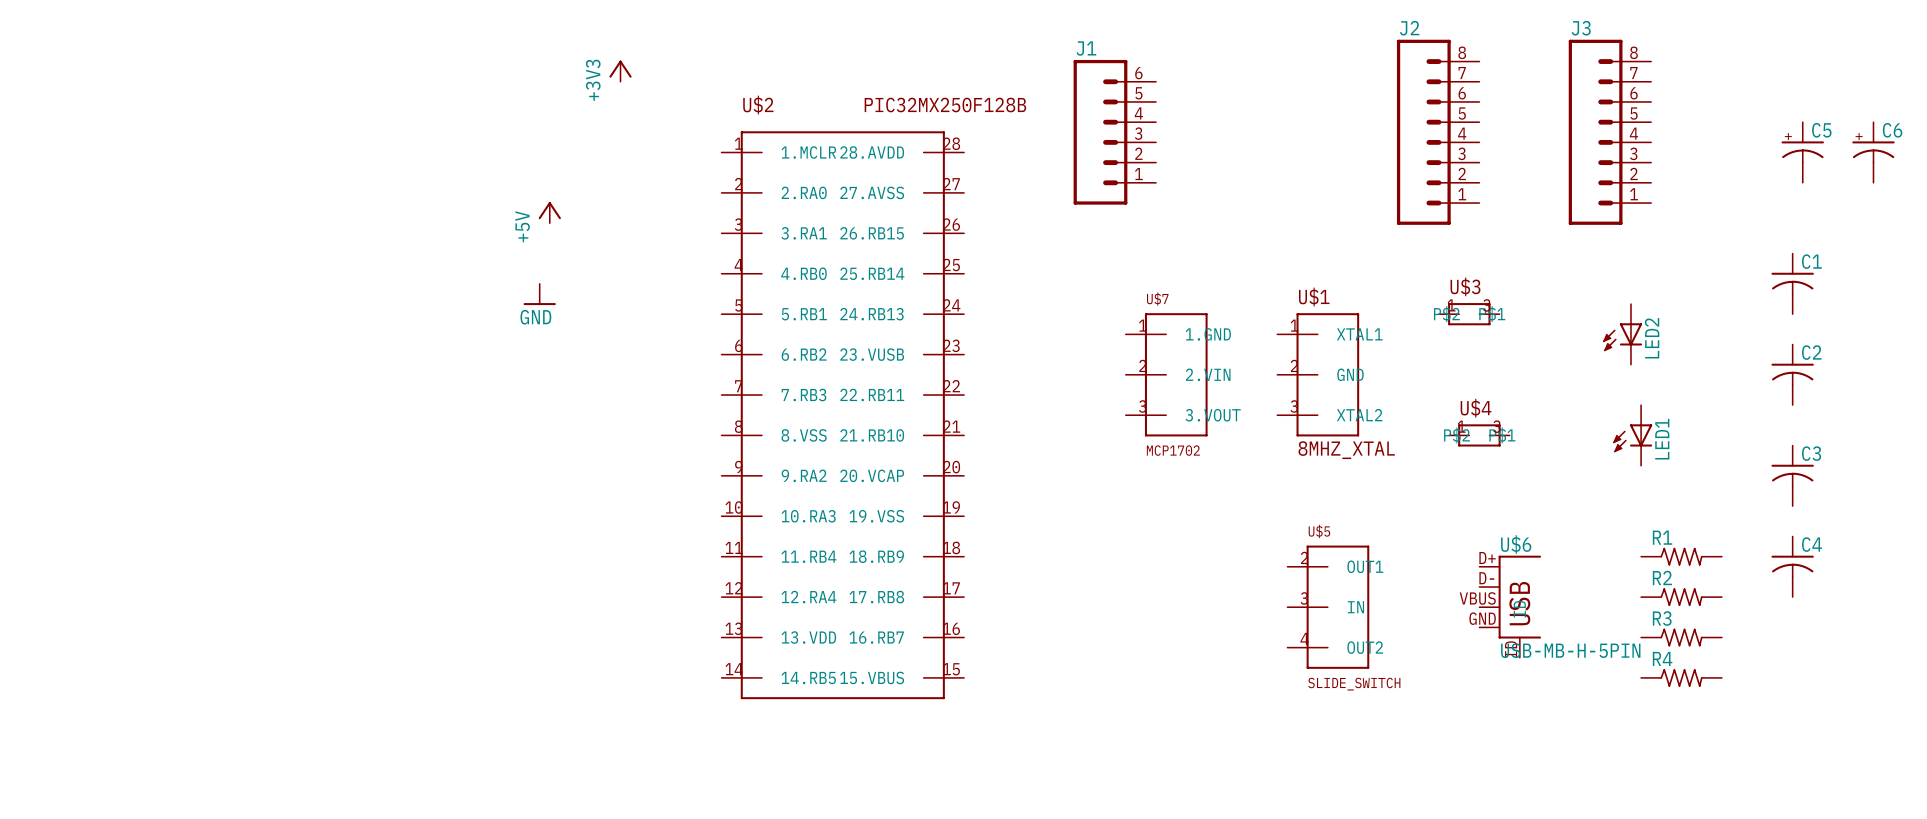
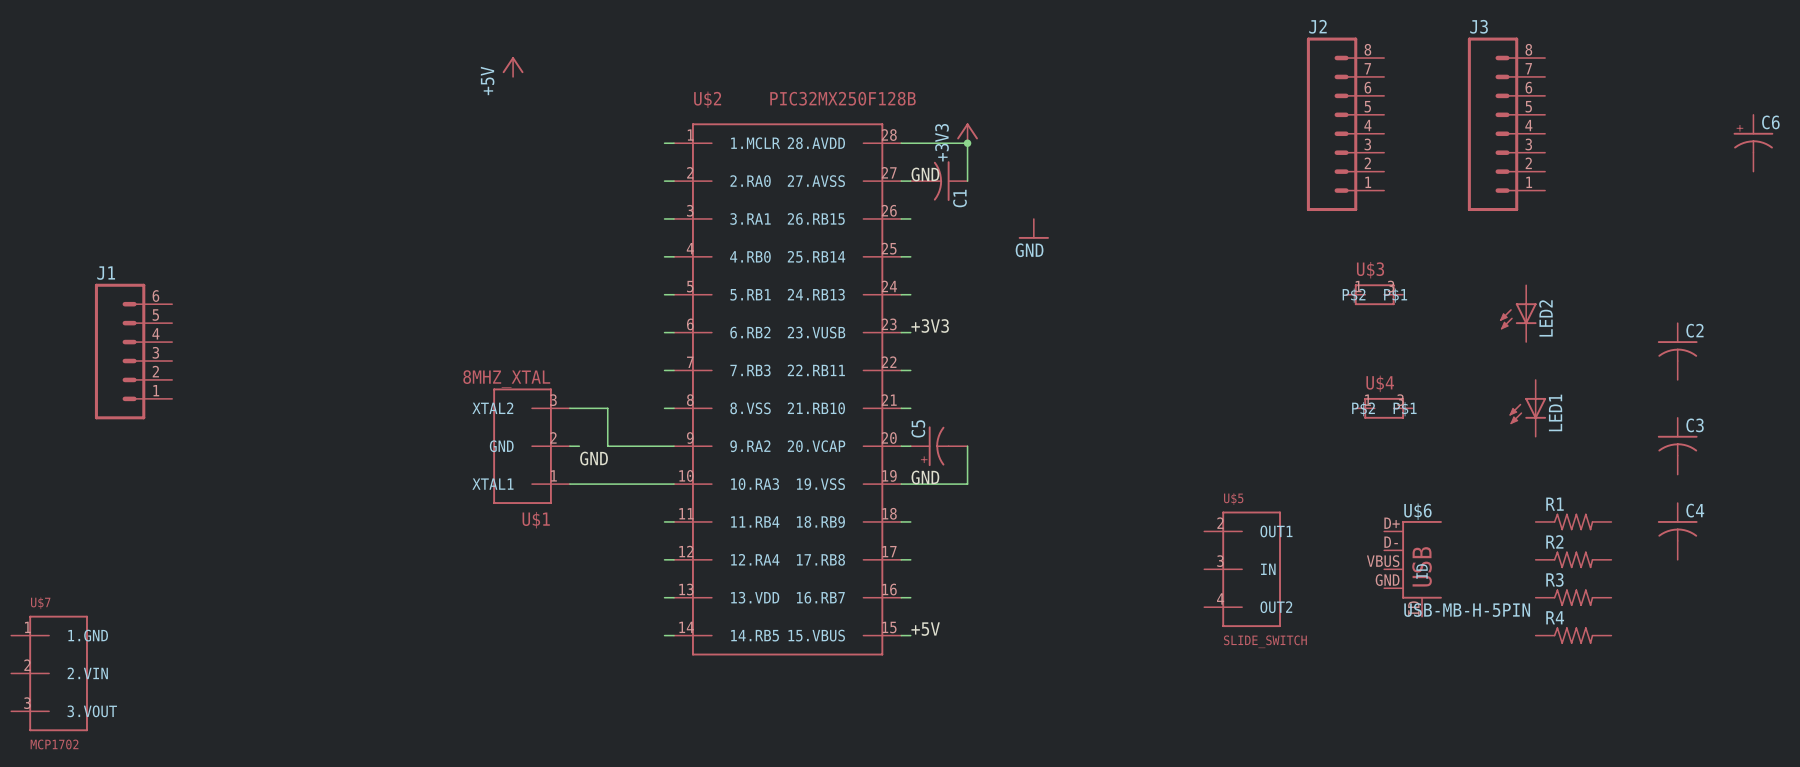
power symbol: +3V3 (620, 71) -> none
U$2 value position: PIC32MX250F128B (945, 105) -> PIC32MX250F128B (843, 98)
J1 position: (1114, 132) -> (133, 351)
power symbol: none -> +3V3 (967, 133)
C5 rotation: 0° (1802, 148) -> 90° counterclockwise (935, 446)
wire: none -> (664, 143) (674, 143)
wire: none -> (901, 143) (967, 143) (967, 181)
junction: none -> (967, 143)
C5 position: (1802, 152) -> (939, 446)
label: none -> GND (925, 174)
wire: none -> (664, 181) (674, 181)
wire: none -> (901, 181) (910, 181)
power symbol position: +5V (549, 212) -> +5V (513, 67)
wire: none -> (664, 218) (674, 218)
wire: none -> (901, 218) (910, 218)
power symbol: none -> GND (1033, 228)
wire: none -> (664, 256) (674, 256)
wire: none -> (901, 256) (910, 256)
C1 rotation: 0° (1792, 283) -> 90° clockwise (939, 181)
C1 position: (1792, 283) -> (939, 181)
power symbol: GND (539, 294) -> none
wire: none -> (664, 294) (674, 294)
wire: none -> (901, 294) (910, 294)
label: none -> +3V3 (930, 325)
wire: none -> (664, 332) (674, 332)
wire: none -> (901, 332) (910, 332)
U$7 position: (1166, 374) -> (49, 673)
U$1 position: (1318, 374) -> (531, 446)
U$1 rotation: 0° (1327, 374) -> 180° (522, 446)
wire: none -> (664, 370) (674, 370)
wire: none -> (901, 370) (910, 370)
wire: none -> (569, 408) (607, 408) (607, 446) (674, 446)
wire: none -> (664, 408) (674, 408)
wire: none -> (901, 408) (910, 408)
wire: none -> (569, 446) (579, 446)
wire: none -> (901, 446) (910, 446)
wire: none -> (967, 446) (967, 484) (901, 484)
label: none -> GND (594, 458)
label: none -> GND (925, 477)
wire: none -> (569, 484) (674, 484)
wire: none -> (664, 521) (674, 521)
wire: none -> (901, 521) (910, 521)
wire: none -> (664, 559) (674, 559)
wire: none -> (901, 559) (910, 559)
wire: none -> (664, 597) (674, 597)
wire: none -> (901, 597) (910, 597)
label: none -> +5V (925, 629)
wire: none -> (664, 635) (674, 635)
wire: none -> (901, 635) (910, 635)

